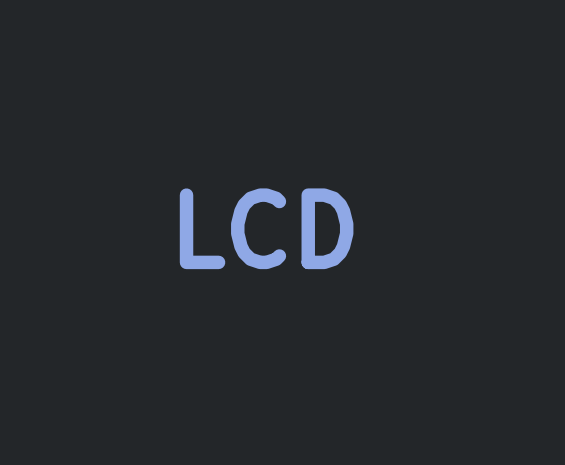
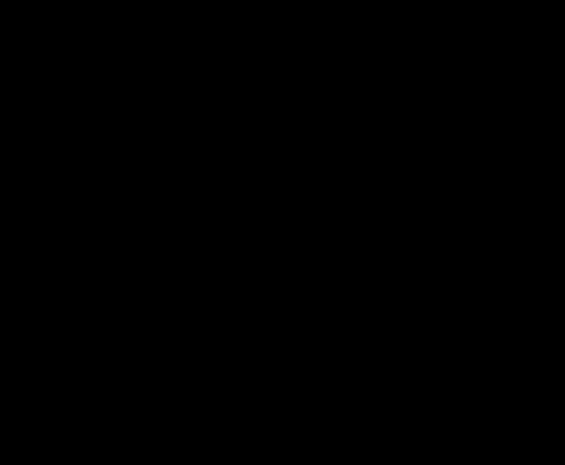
text: LCD (266, 228) -> none

